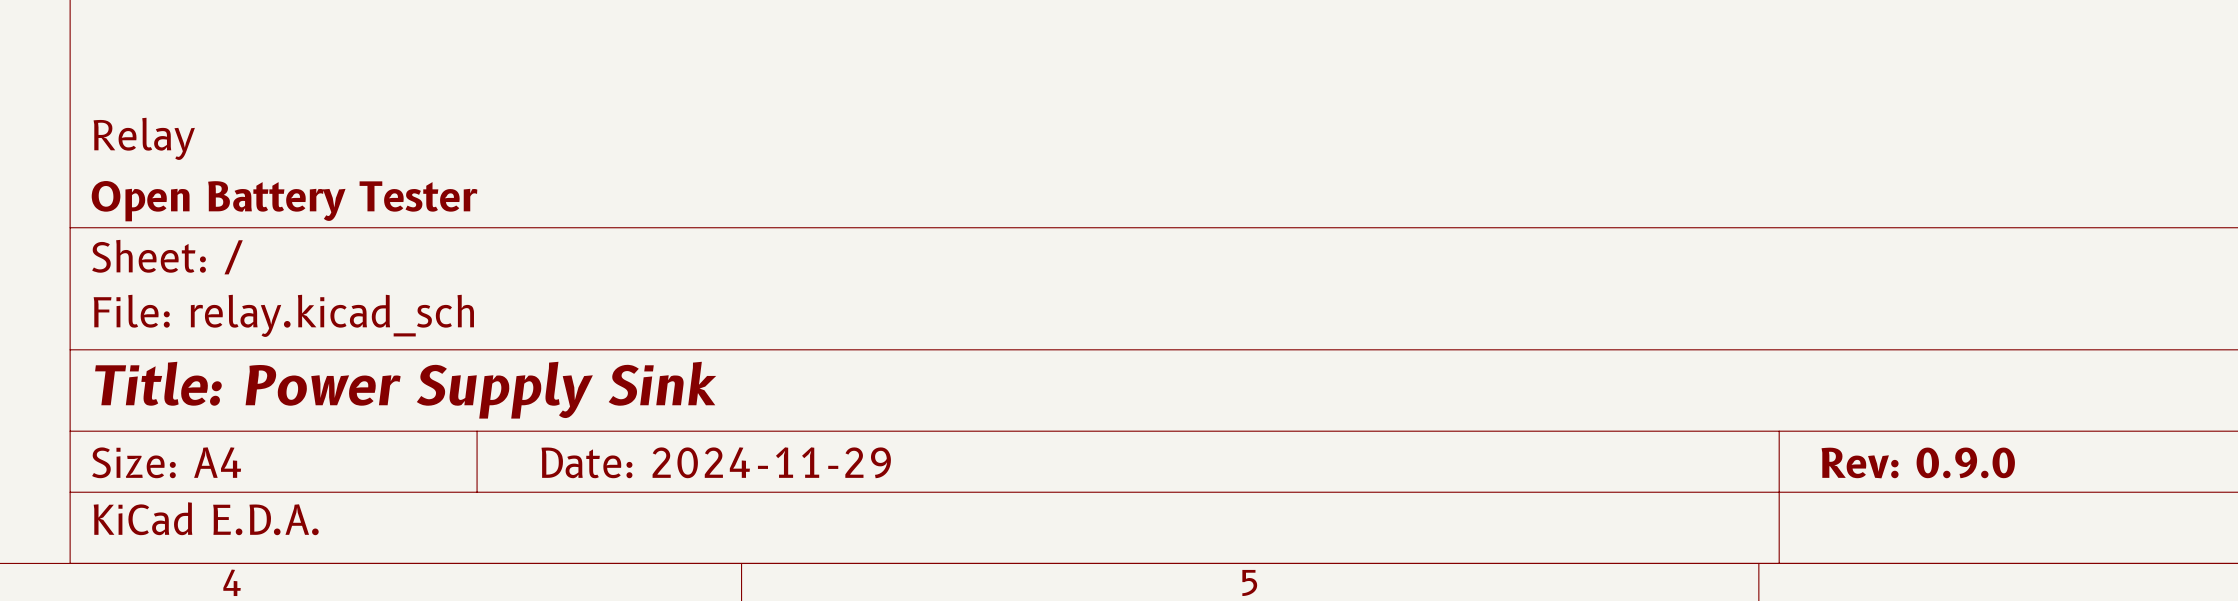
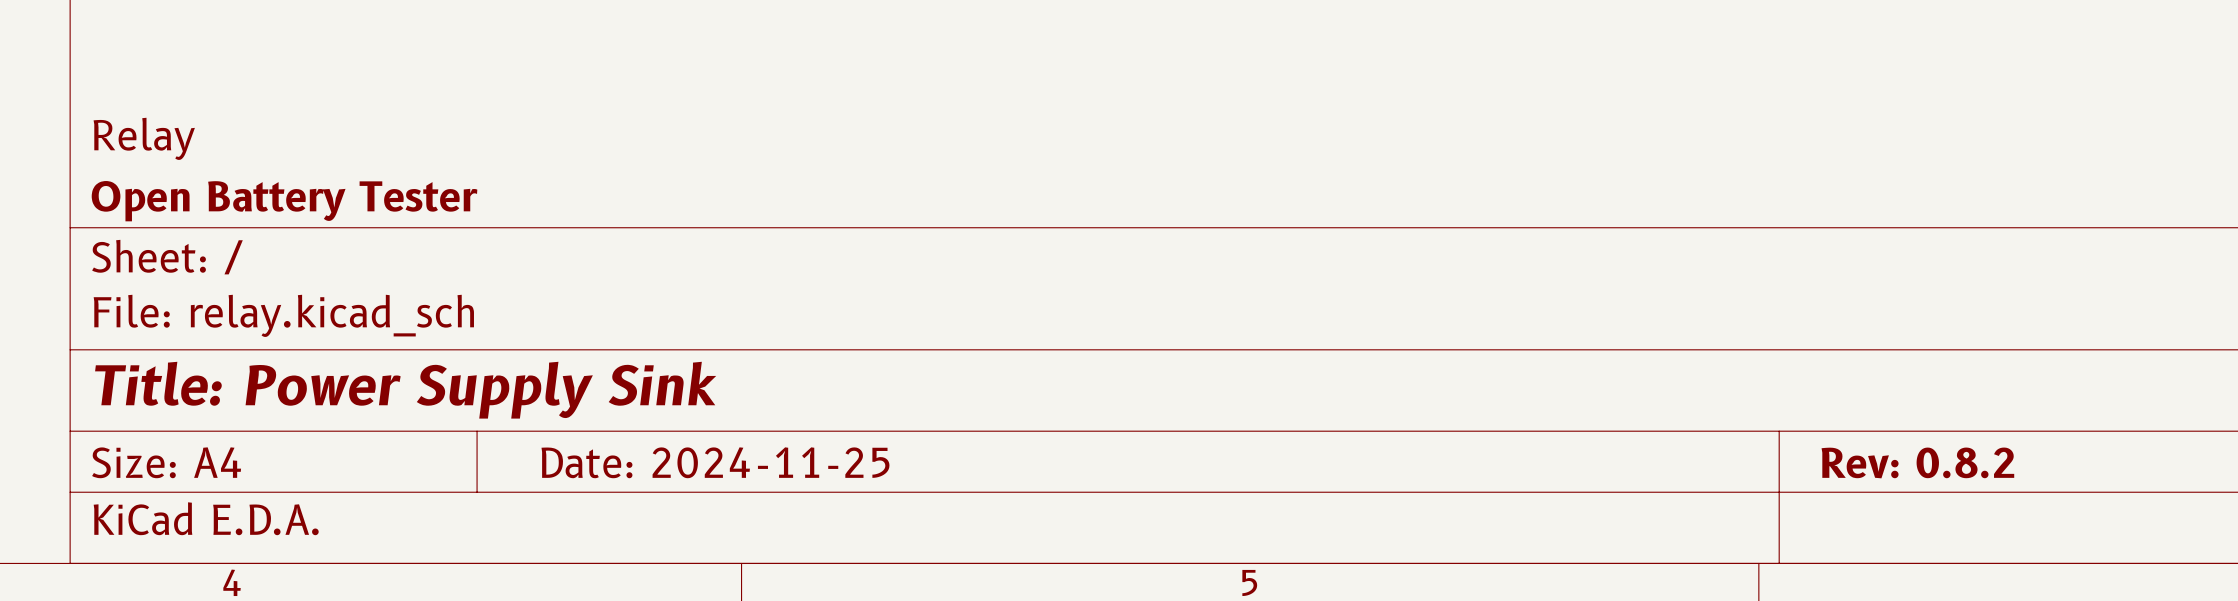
title block: Date: 2024-11-29 (716, 462) -> Date: 2024-11-25 (715, 462)
title block: Rev: 0.9.0 (1918, 462) -> Rev: 0.8.2 (1917, 462)

